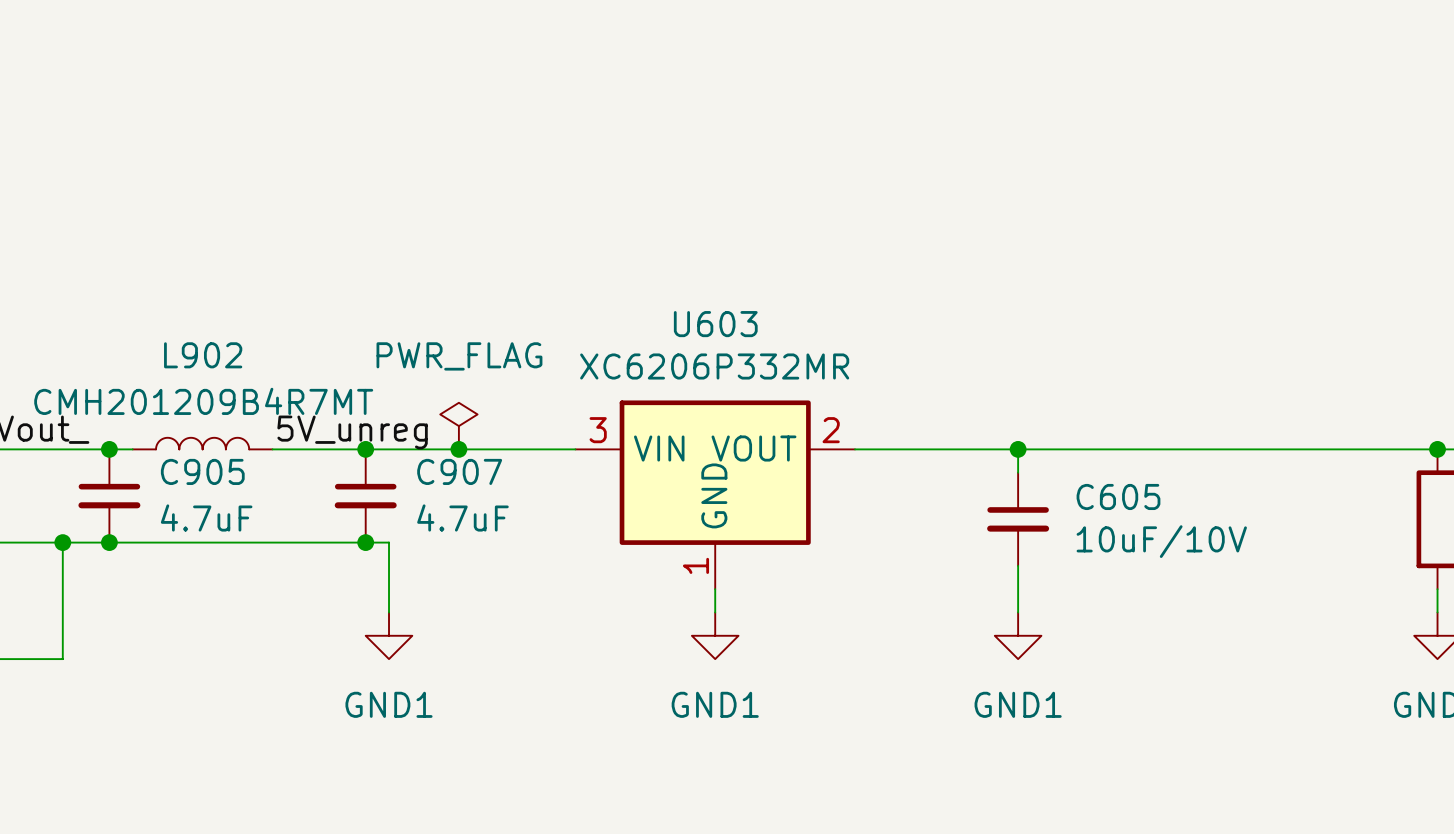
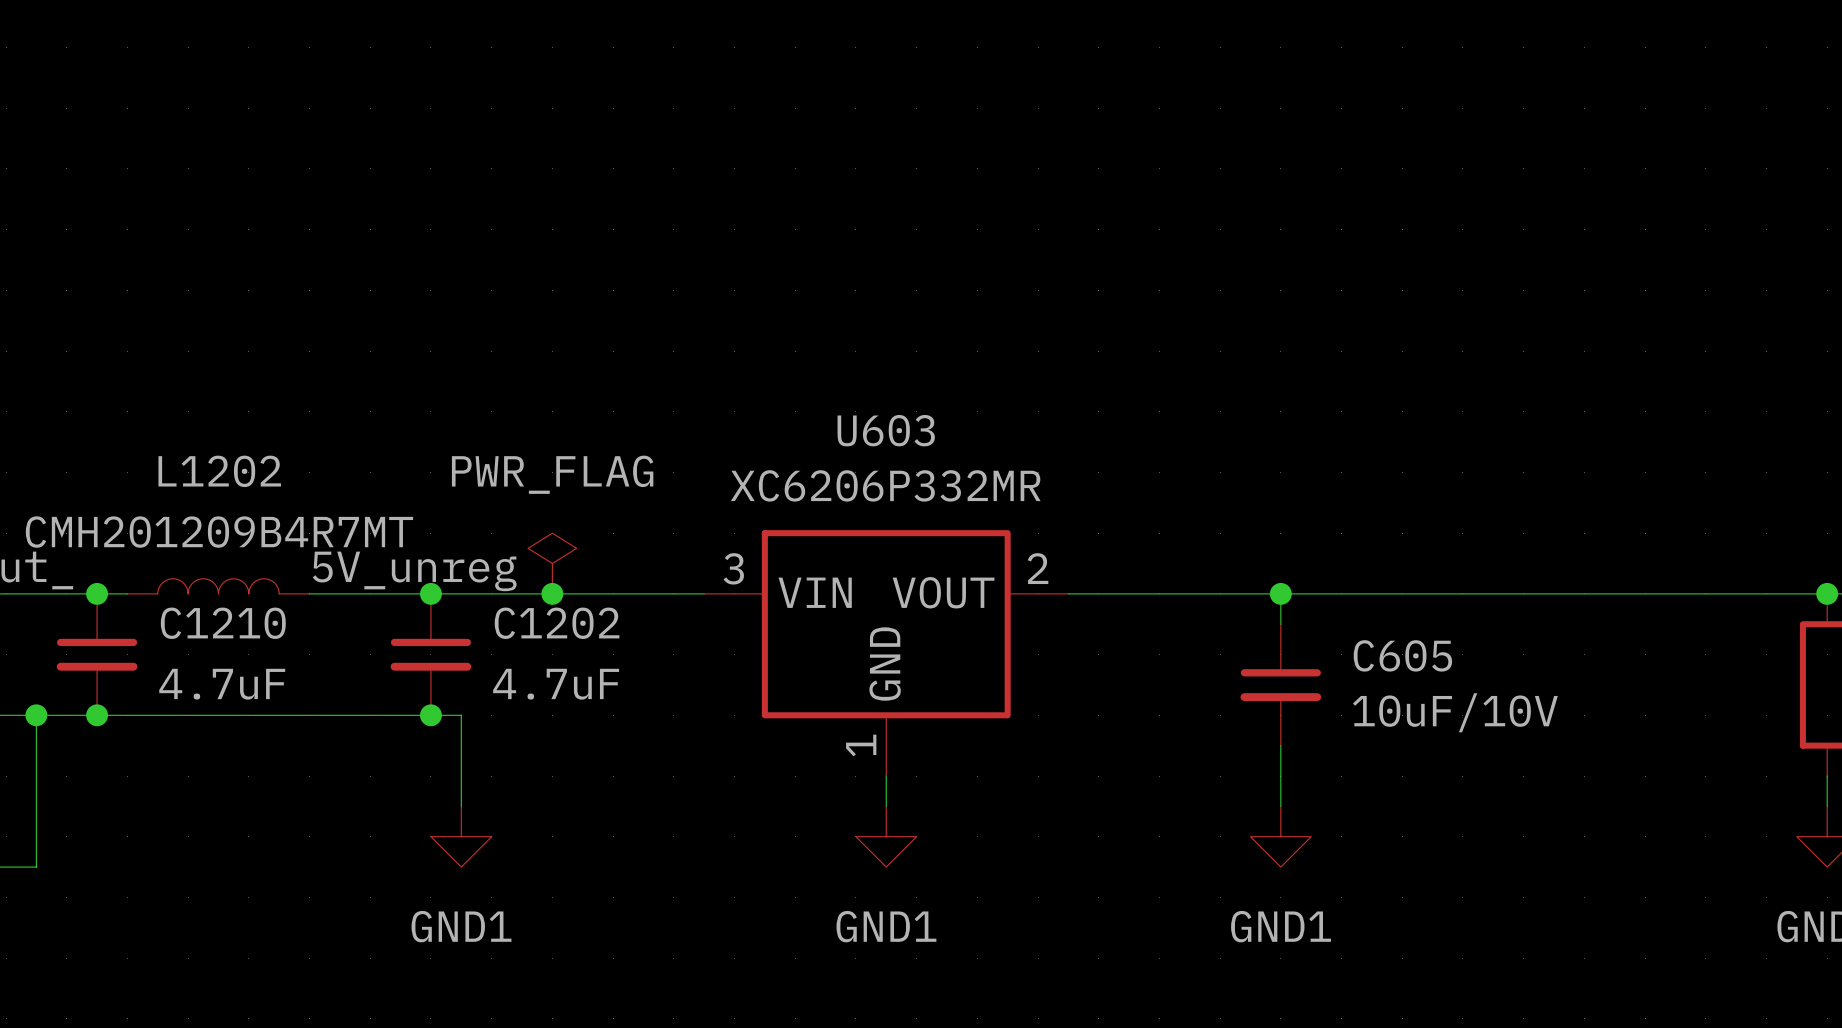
L902 name: L902 (203, 355) -> L1202 (219, 471)
C905 name: C905 (202, 471) -> C1210 (223, 623)
C907 name: C907 (459, 471) -> C1202 (557, 623)

